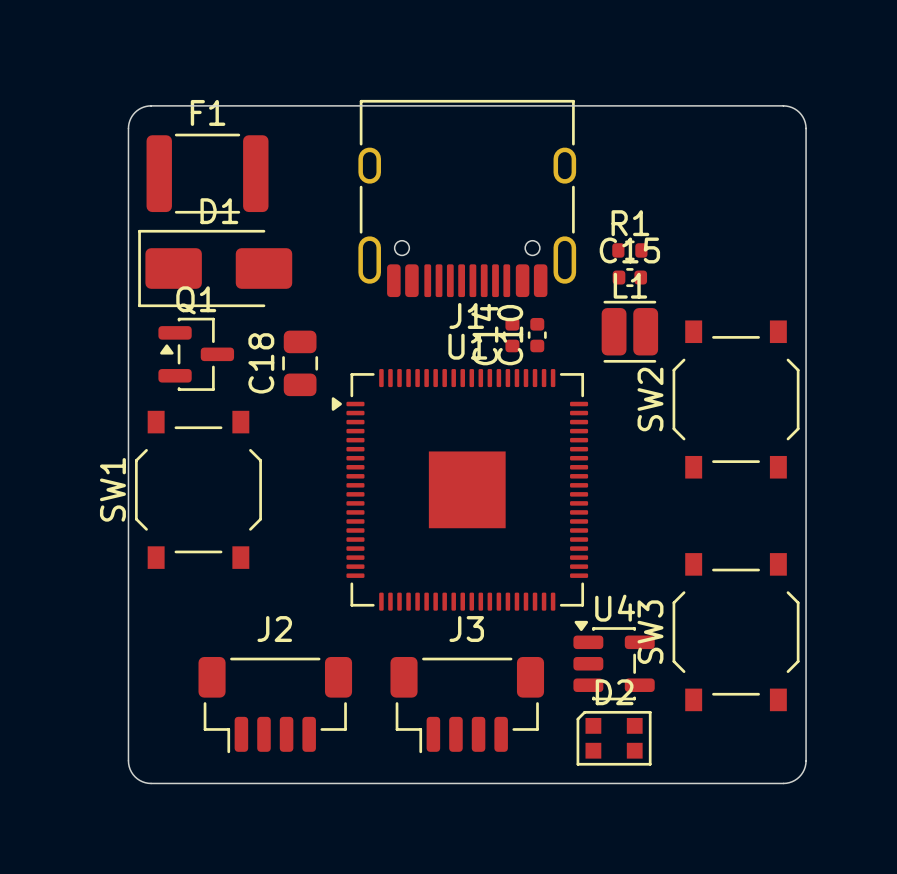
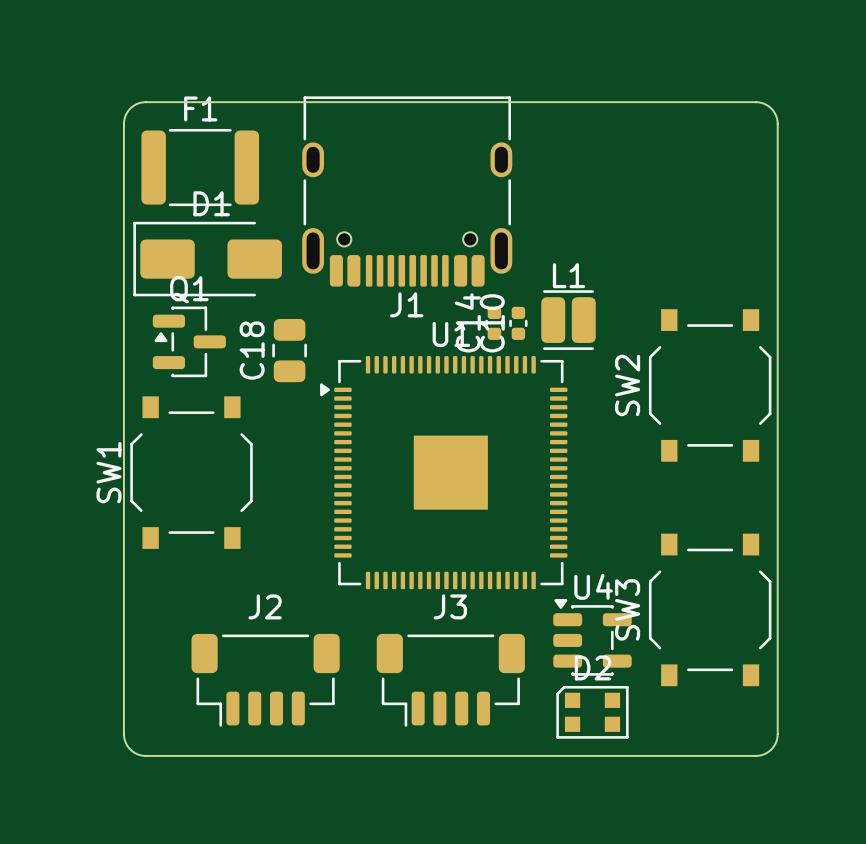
J1 position: (467, 198) -> (407, 191)
R1: (629, 250) -> none
C15: (629, 277) -> none
L1 position: (629, 331) -> (568, 320)

